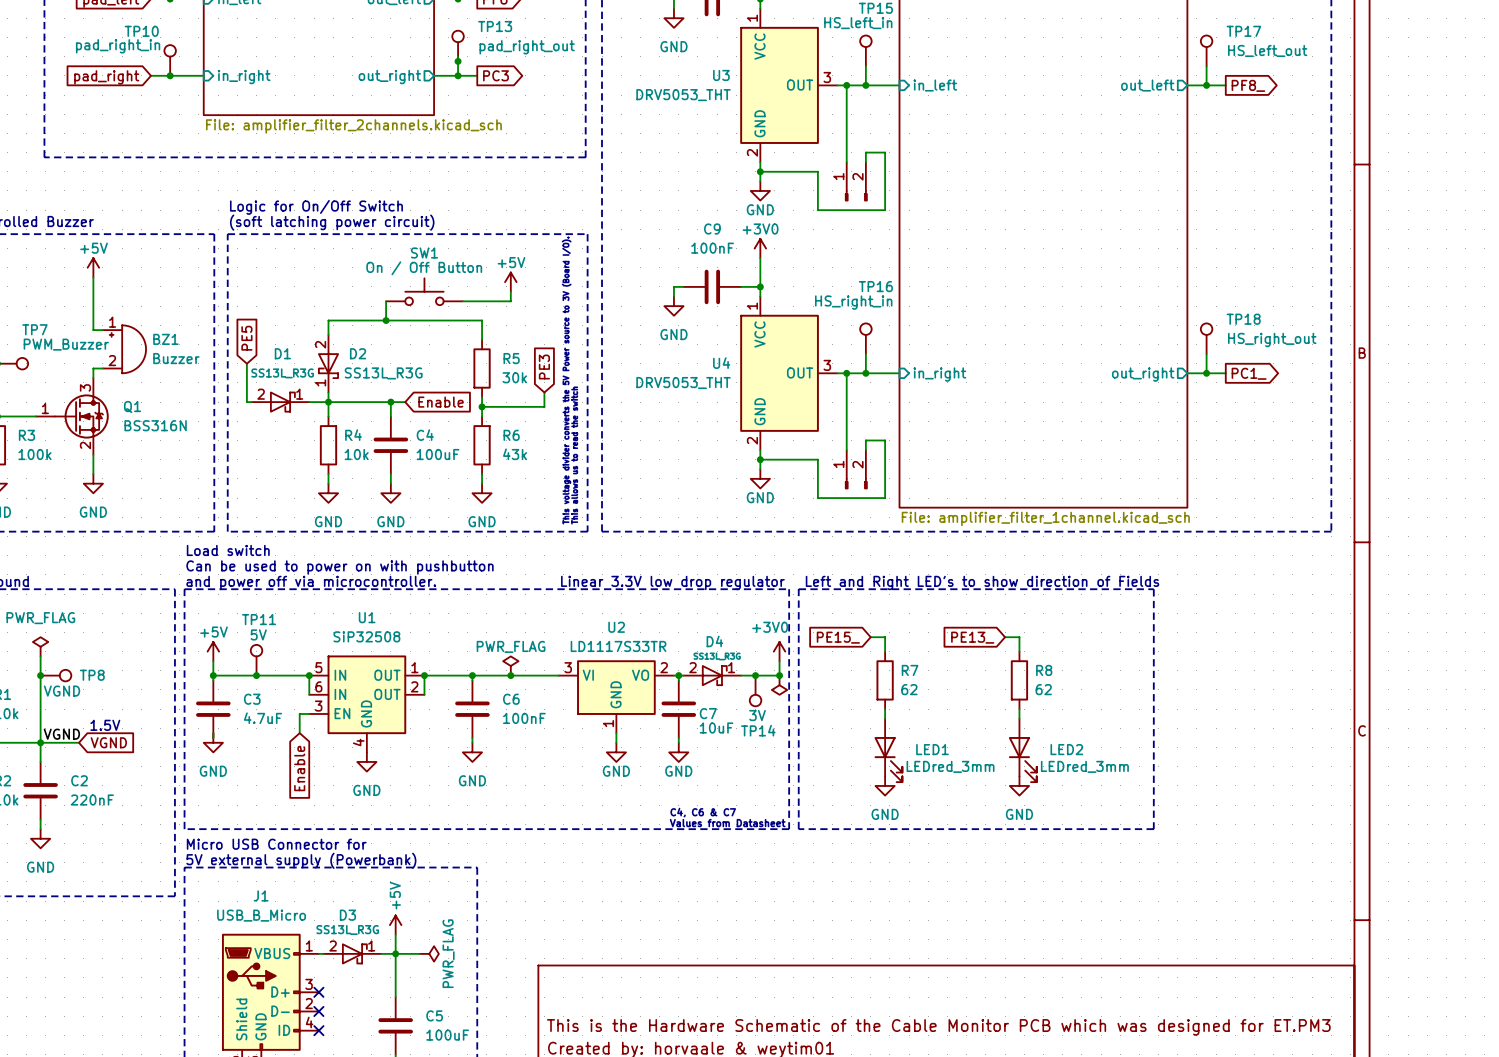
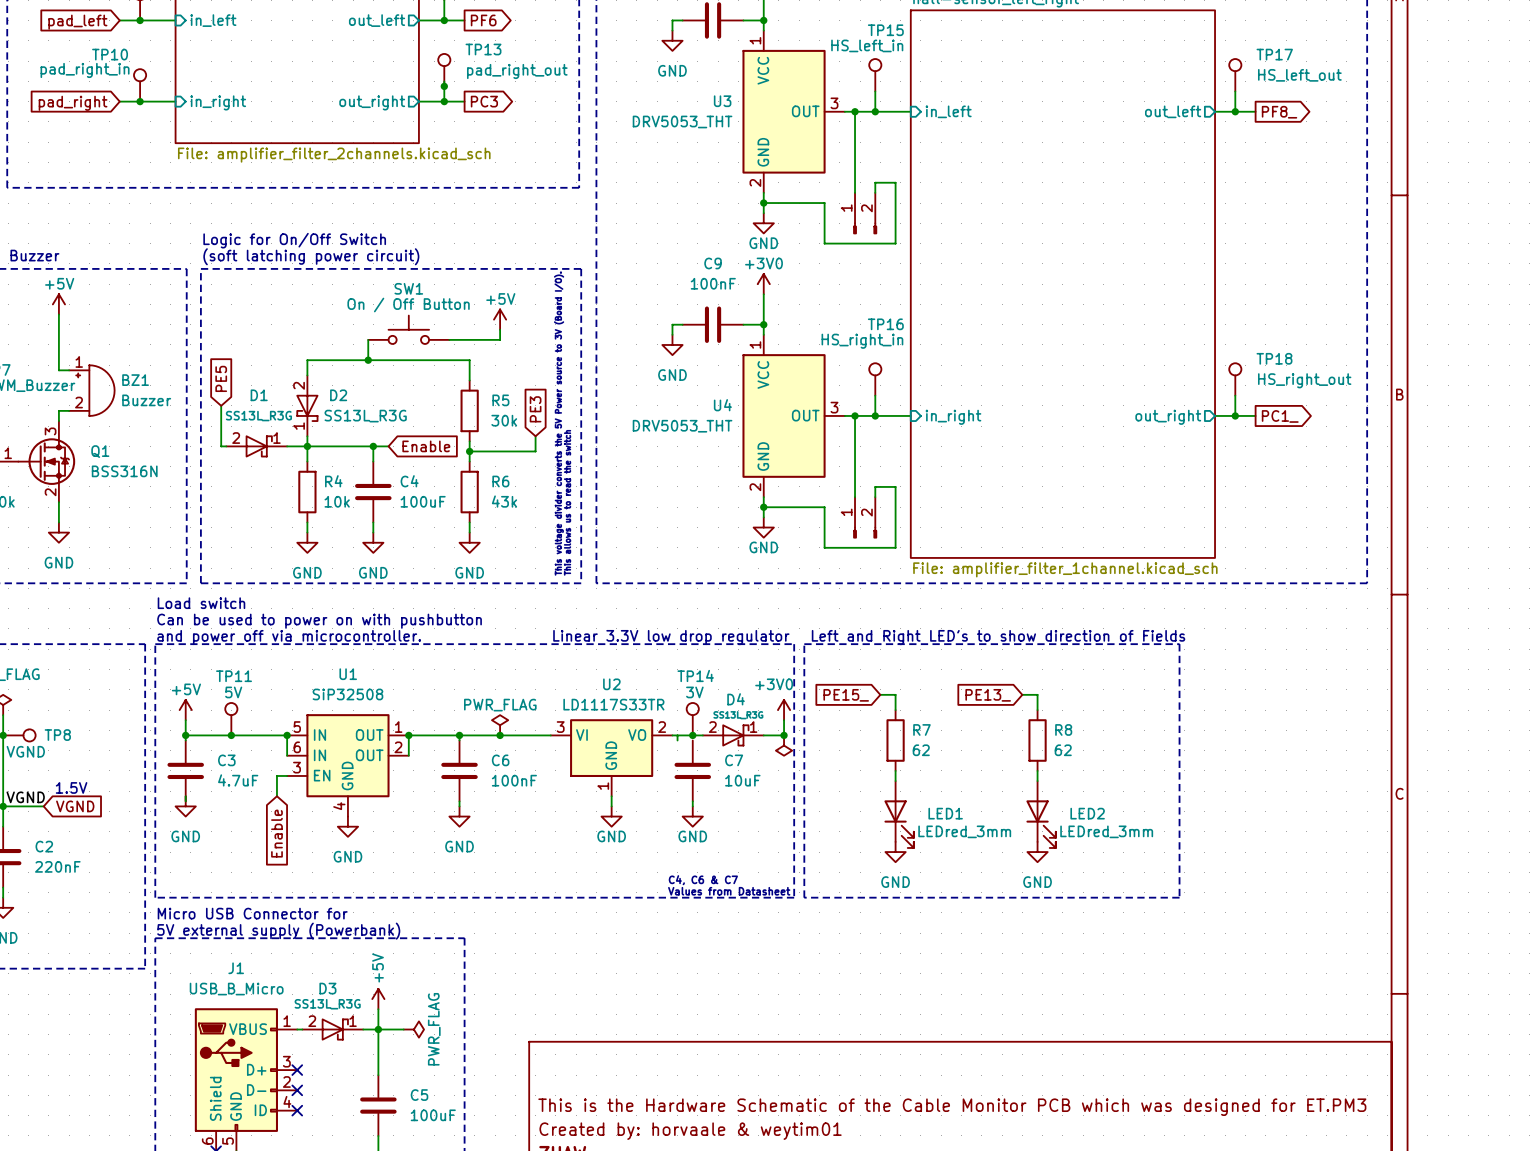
junction position: (678, 675) -> (692, 735)
D4 position: (712, 675) -> (733, 735)
junction: (755, 675) -> none
TP14 position: (755, 690) -> (692, 719)
TP14 rotation: 0° (755, 700) -> 180° (692, 709)
C7 position: (678, 709) -> (692, 770)
C7 name position: C7 (708, 713) -> C7 (734, 760)
C7 value position: 10uF (716, 728) -> 10uF (742, 780)
wire: (678, 737) (678, 742) -> (692, 801) (692, 806)
power symbol position: GND (678, 752) -> GND (692, 816)

